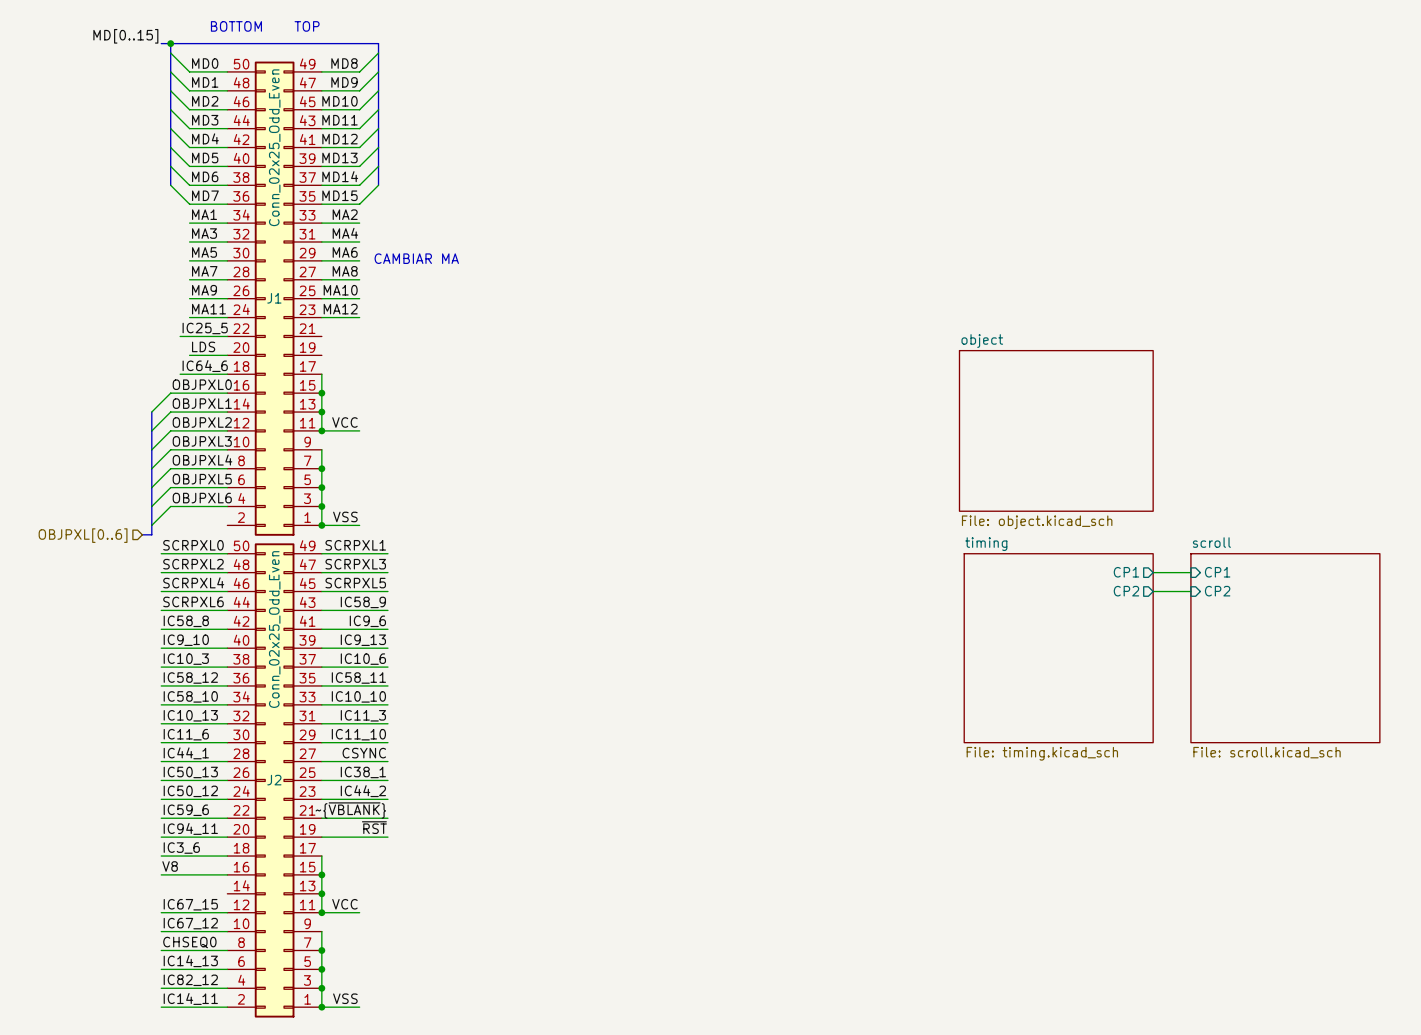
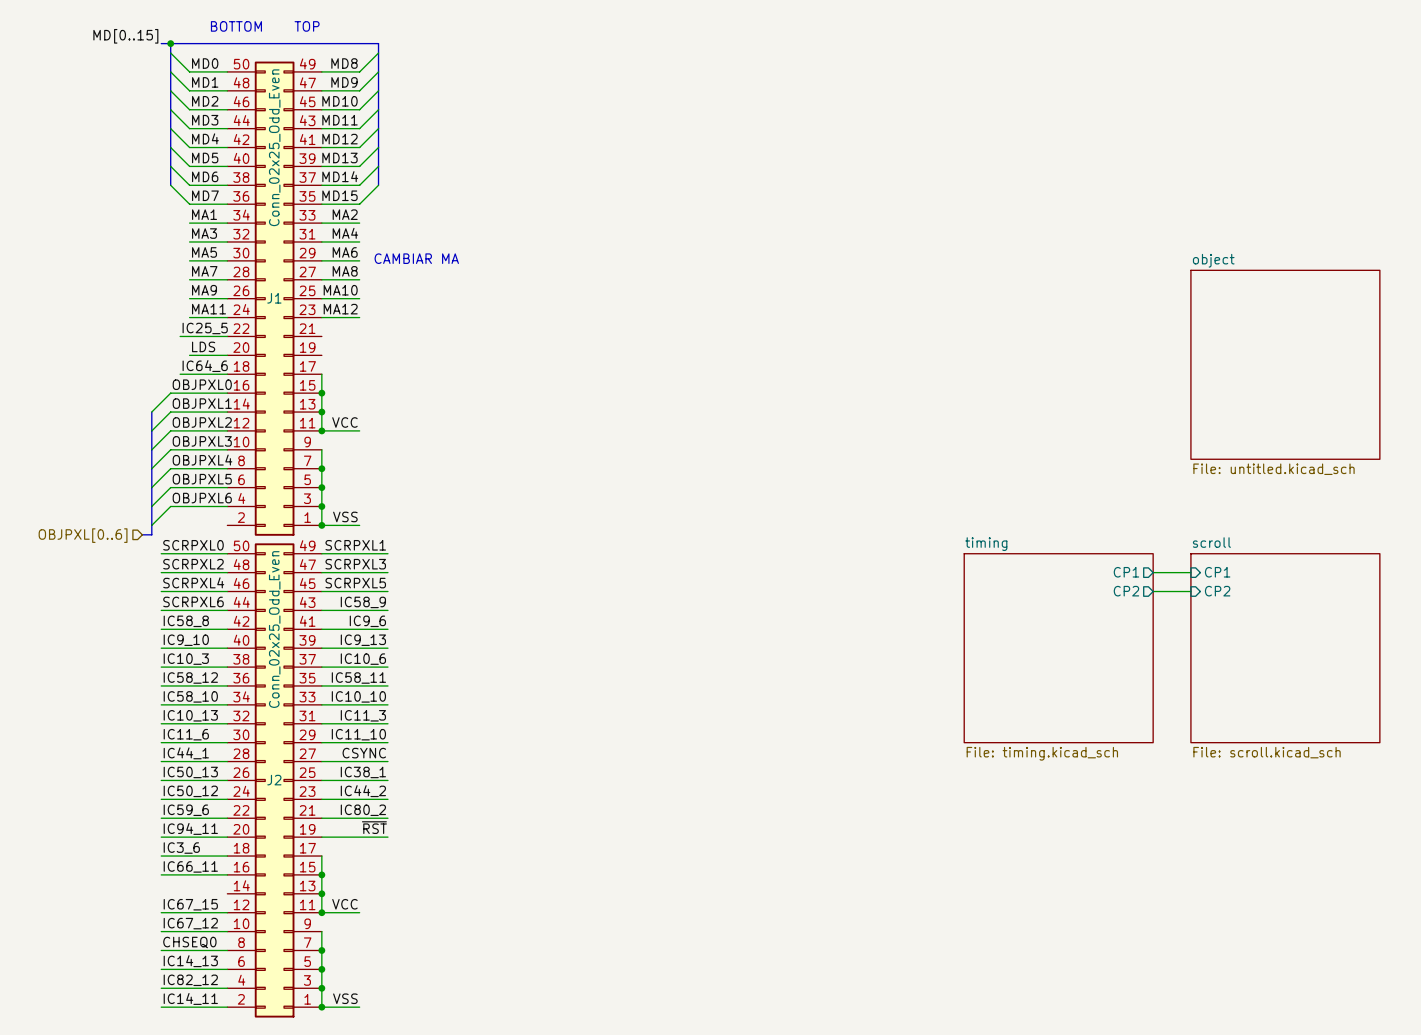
sheet object: none -> File: untitled.kicad_sch (1285, 364)
sheet object: File: object.kicad_sch (1056, 430) -> none
label: ~{~{VBLANK}} (350, 810) -> IC80_2 (363, 810)
label: V8 (170, 866) -> IC66_11 (190, 866)

